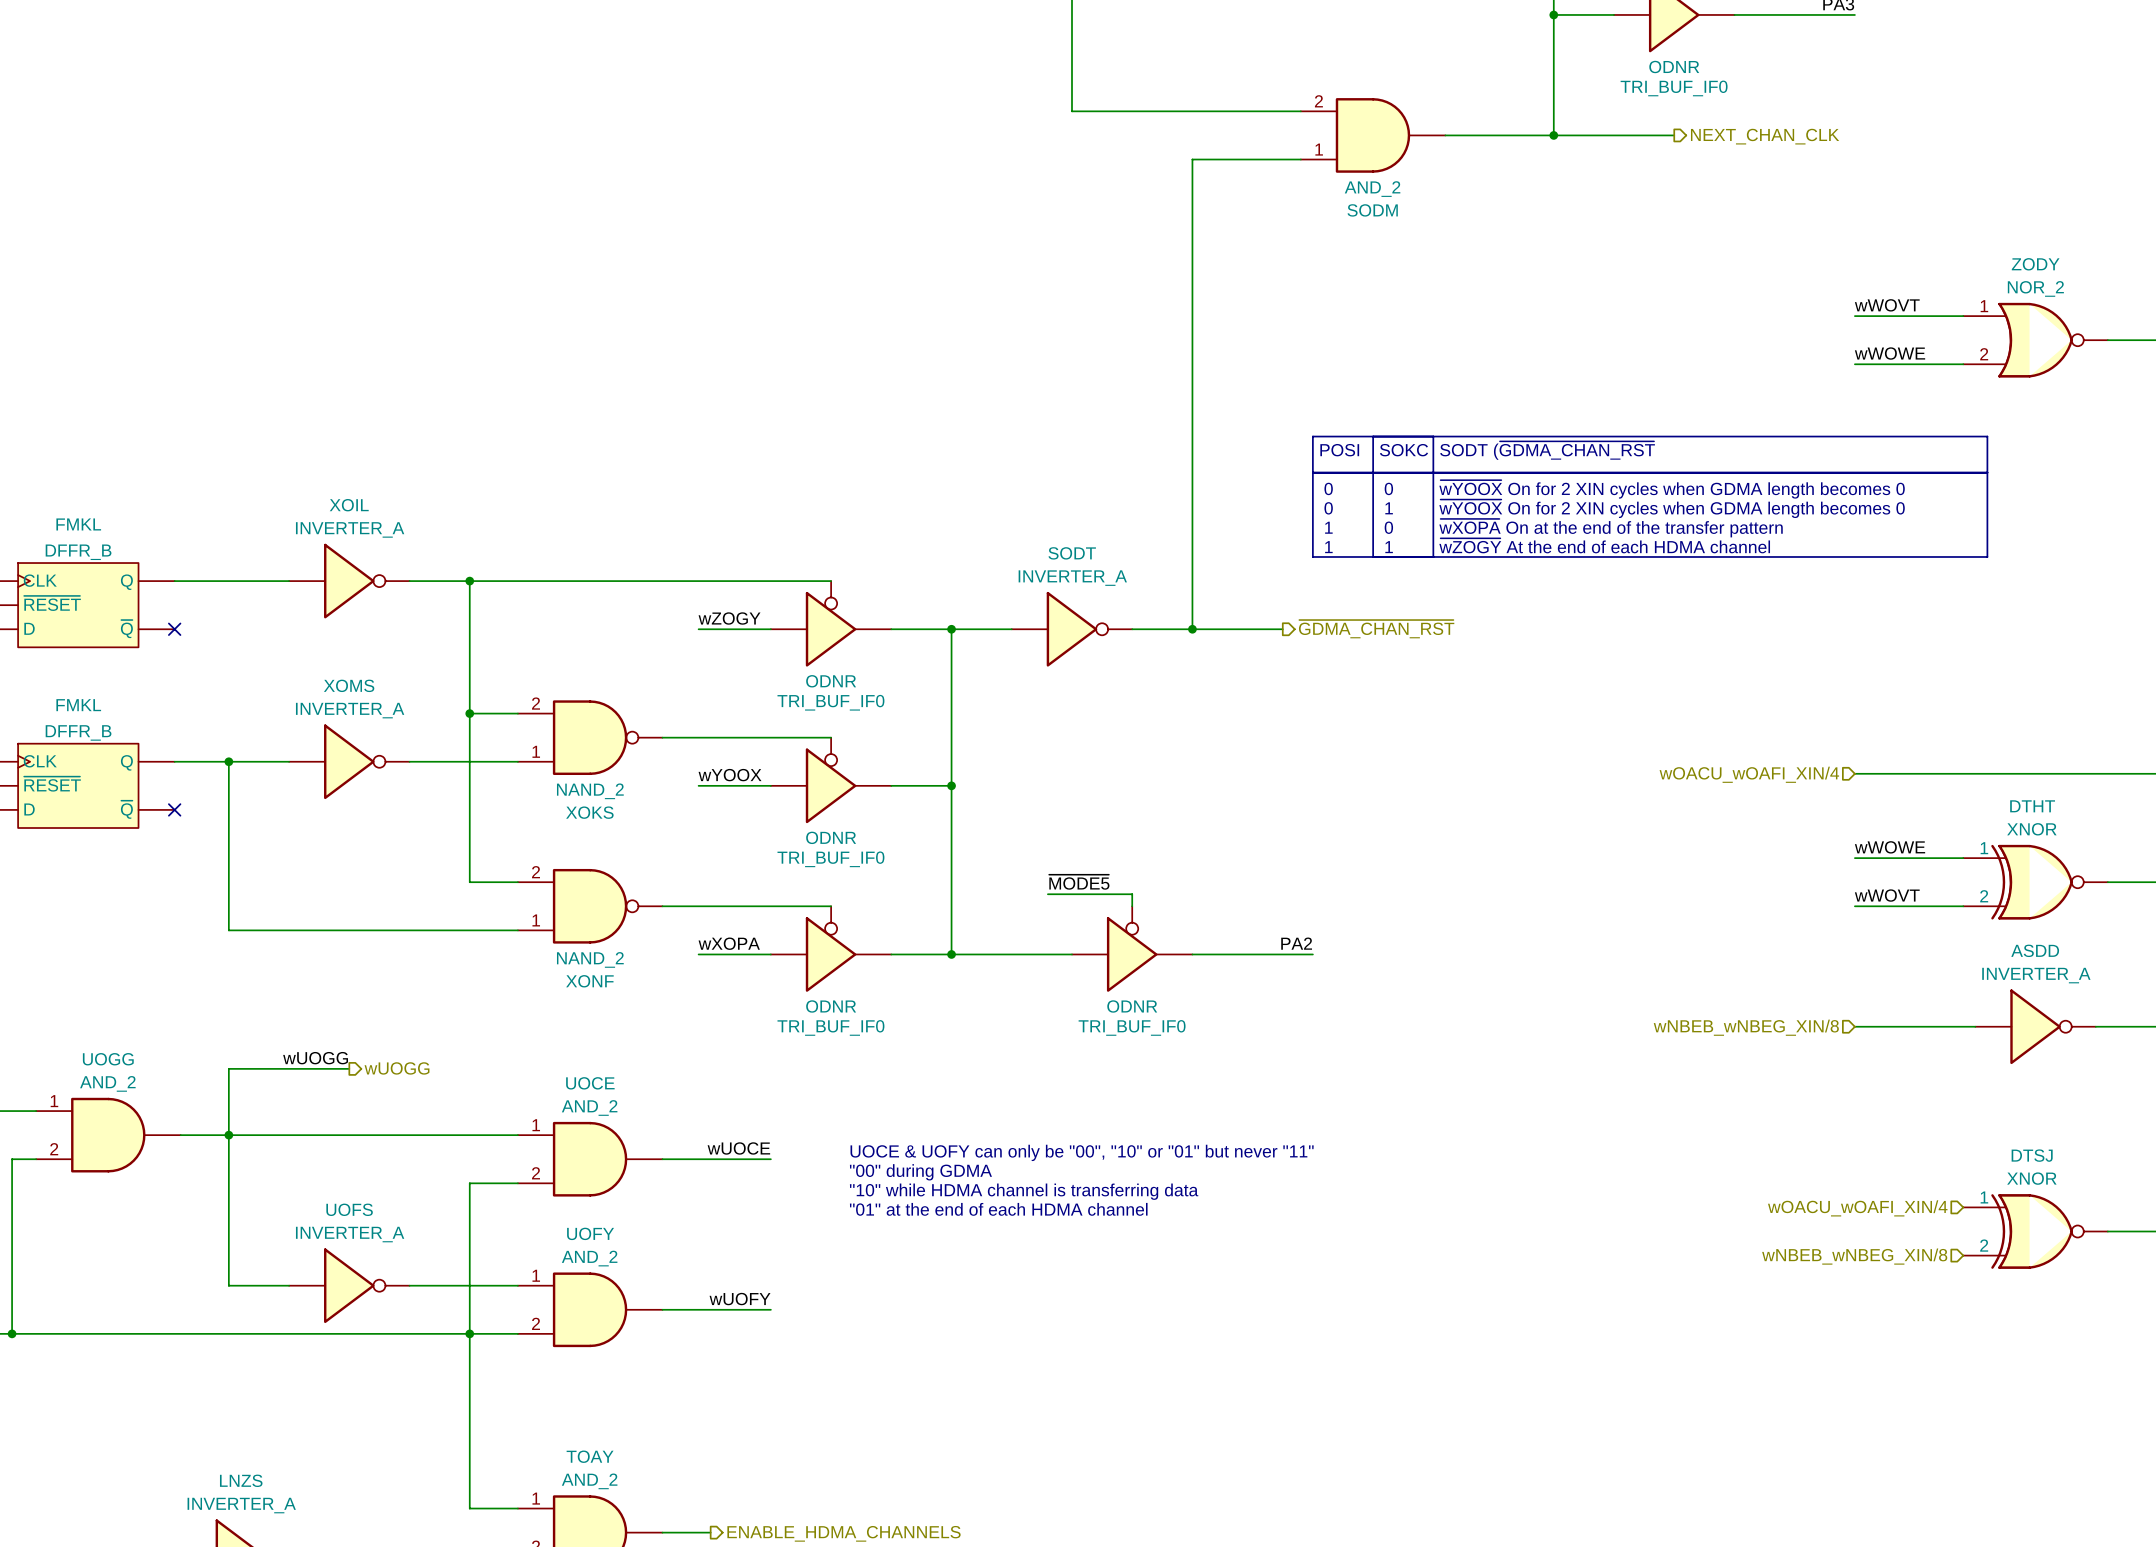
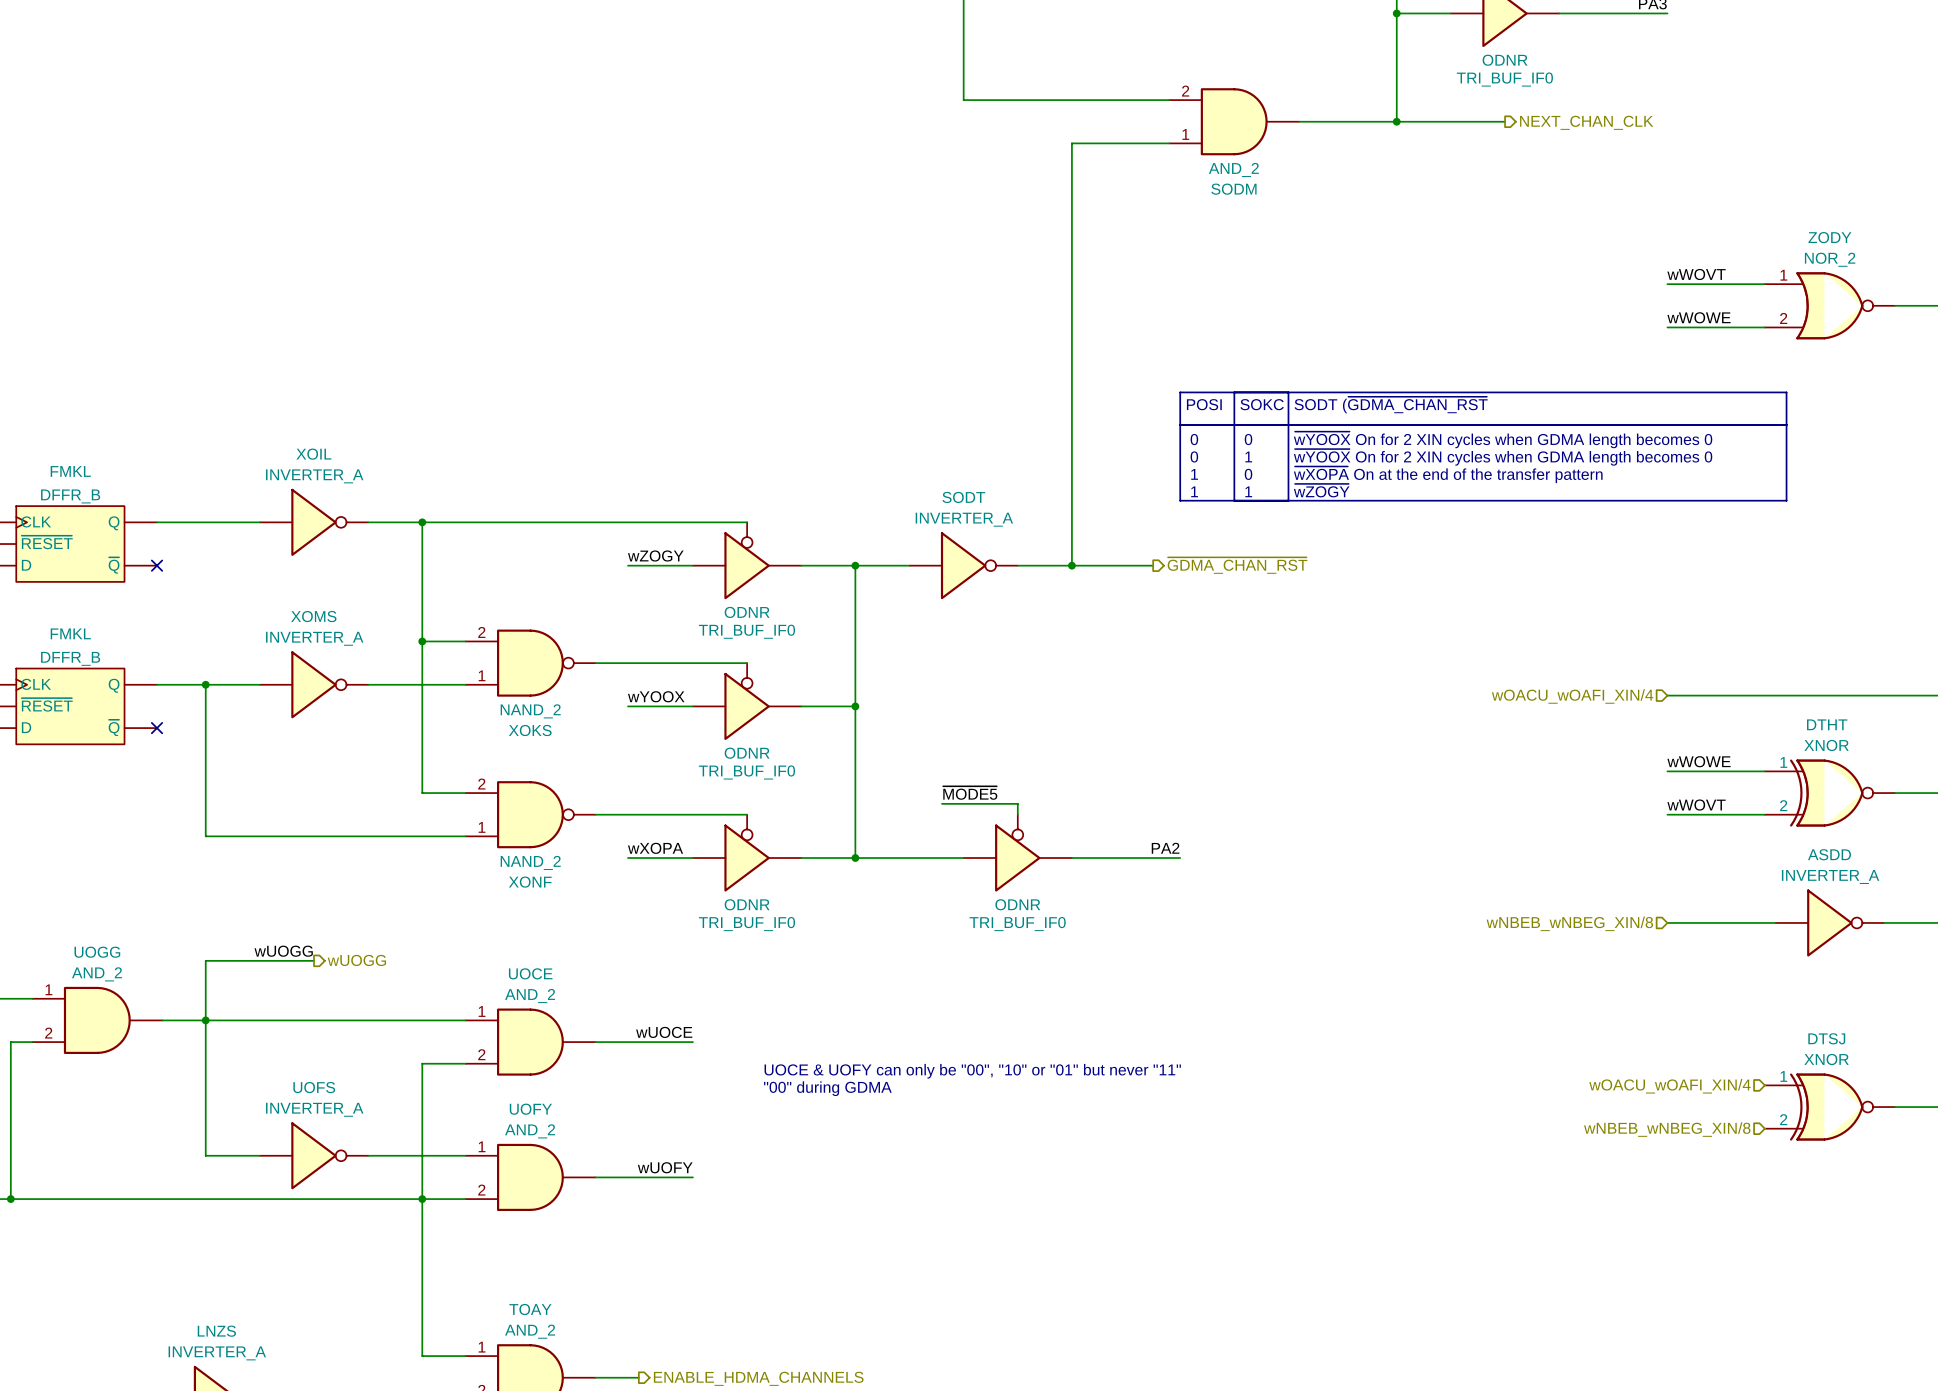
text: ~{wZOGY} At the end of each HDMA channel (1604, 545) -> ~{wZOGY} (1321, 490)
text: UOCE & UOFY can only be "00", "10" or "01" but never "11" (1082, 1152) -> none
text: "00" during GDMA (920, 1172) -> none
text: "10" while HDMA channel is transferring data (1024, 1191) -> UOCE & UOFY can only be "00", "10" or "01" but never "11" (972, 1071)
text: "01" at the end of each HDMA channel (998, 1209) -> "00" during GDMA (827, 1088)

